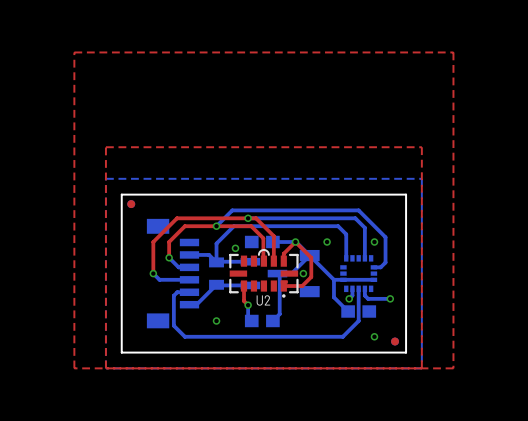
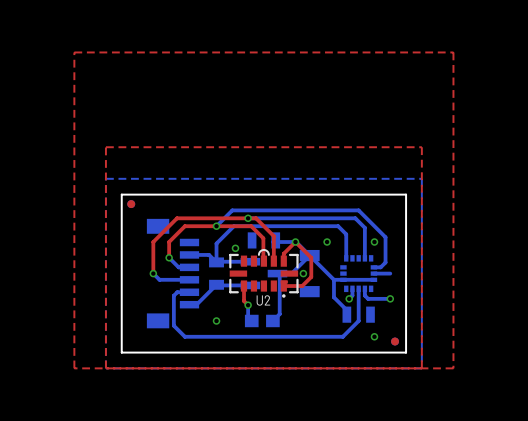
part footprint: [244, 235, 280, 249] -> [247, 232, 281, 249]
bottom track: none -> (373, 273) (390, 273)
part footprint: [341, 305, 377, 318] -> [342, 306, 375, 323]

